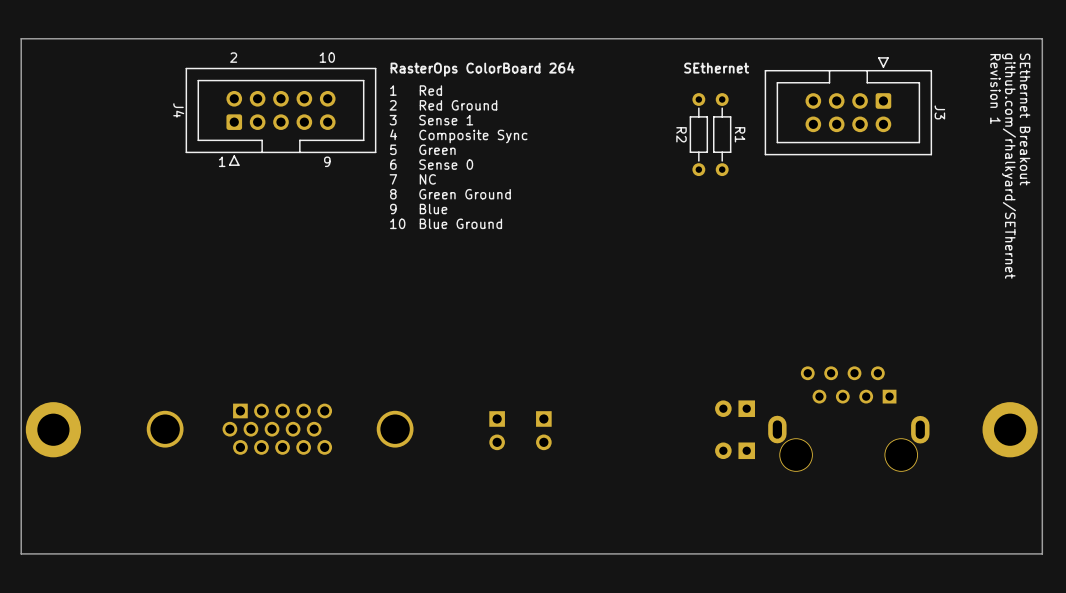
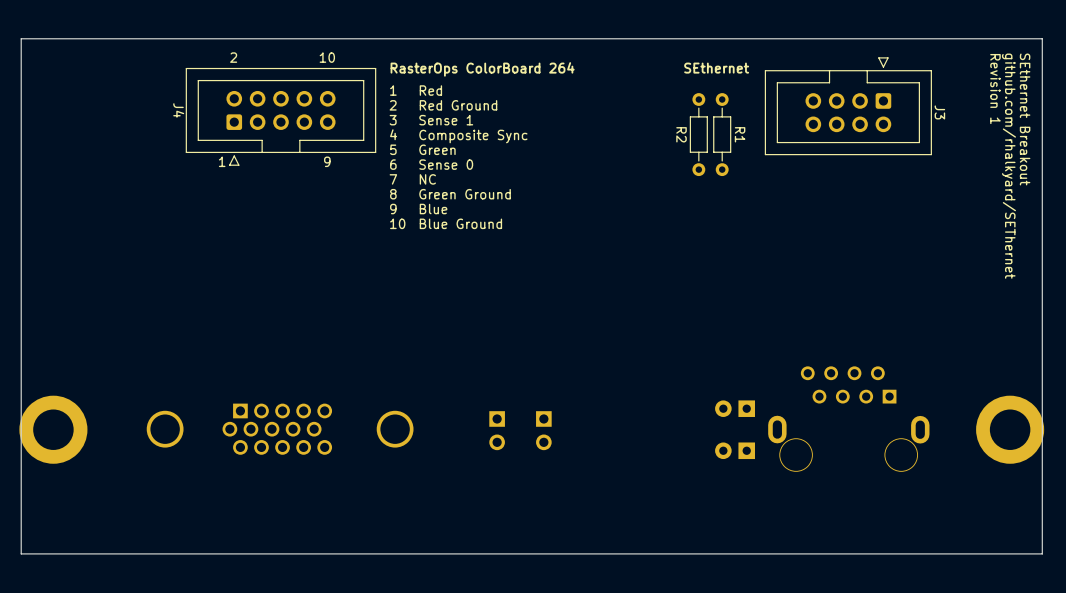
part footprint: [25, 402, 82, 458] -> [19, 395, 88, 464]
part footprint: [982, 402, 1038, 458] -> [976, 395, 1045, 464]

